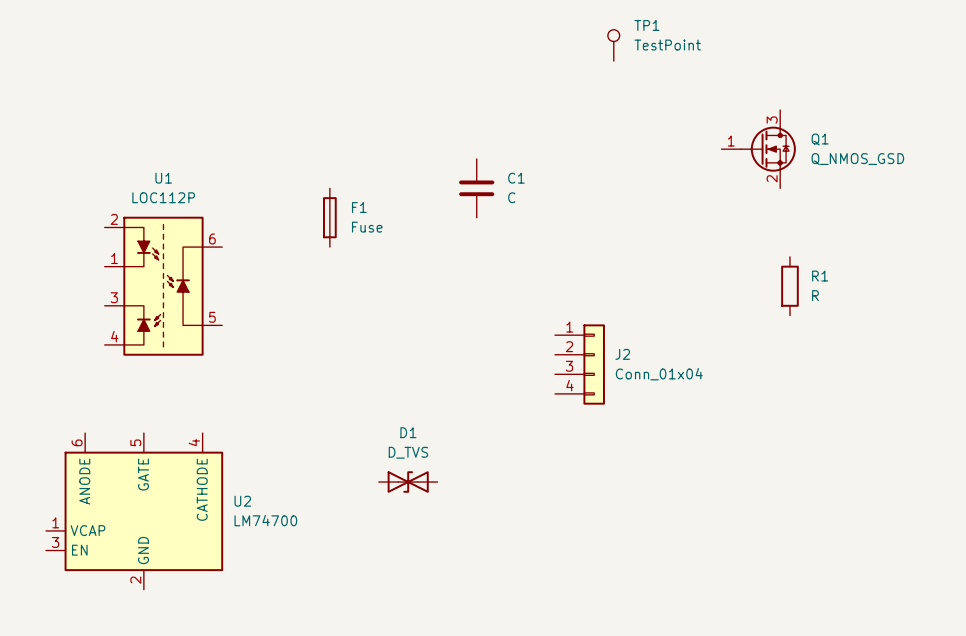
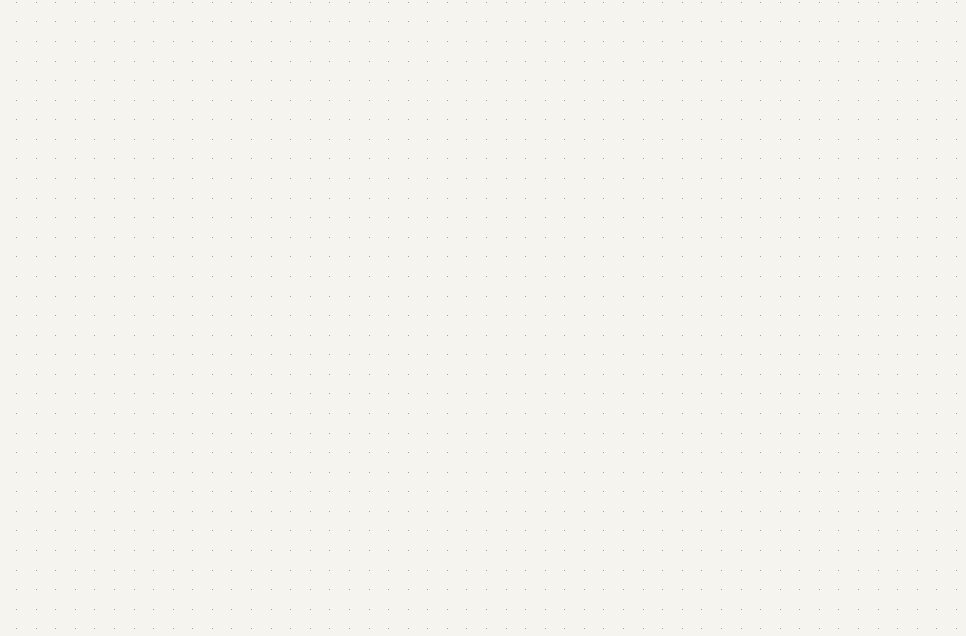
TP1: TestPoint (613, 45) -> none
Q1: Q_NMOS_GSD (758, 149) -> none
C1: C (476, 188) -> none
F1: Fuse (329, 217) -> none
U1: LOC112P (163, 286) -> none
R1: R (789, 286) -> none
J2: Conn_01x04 (579, 364) -> none
D1: D_TVS (408, 482) -> none
U2: LM74700 (134, 511) -> none

